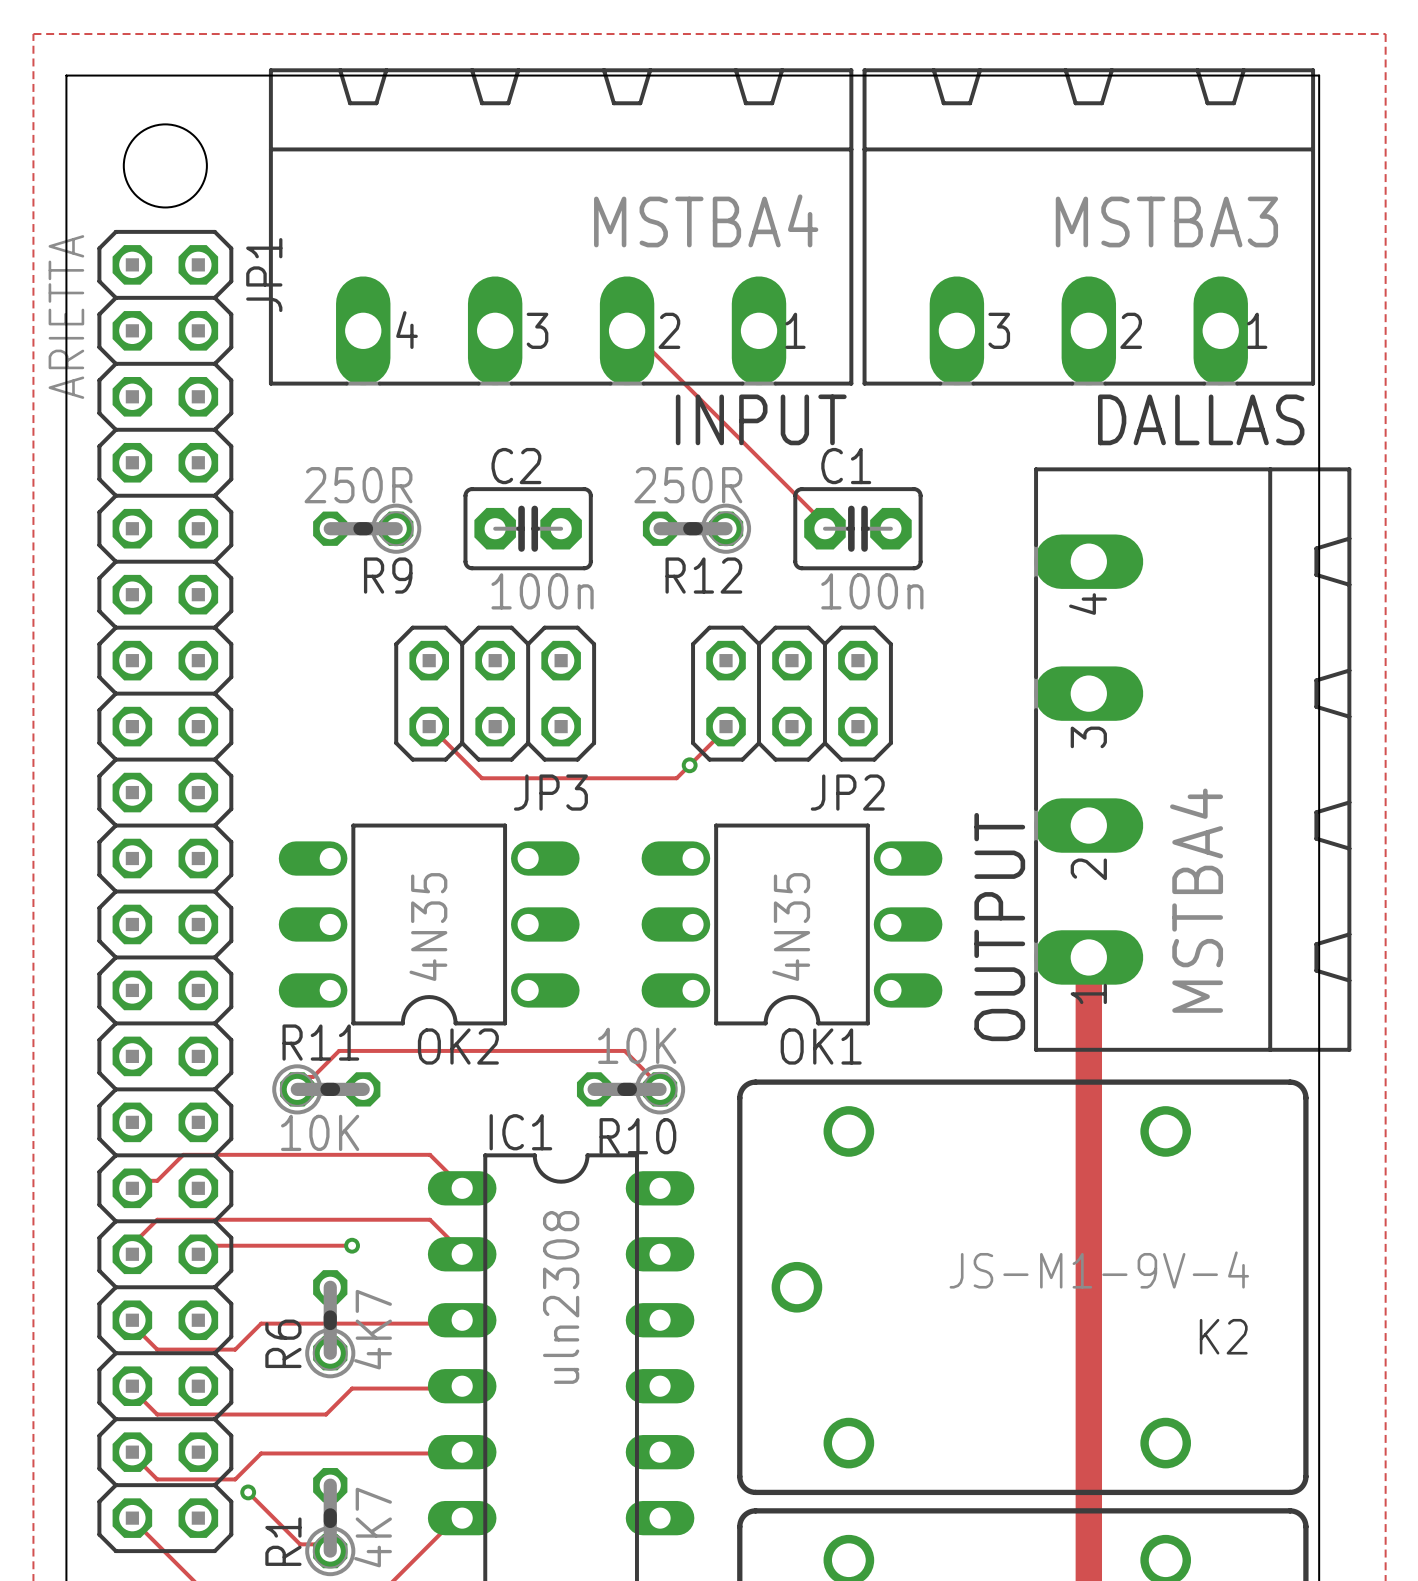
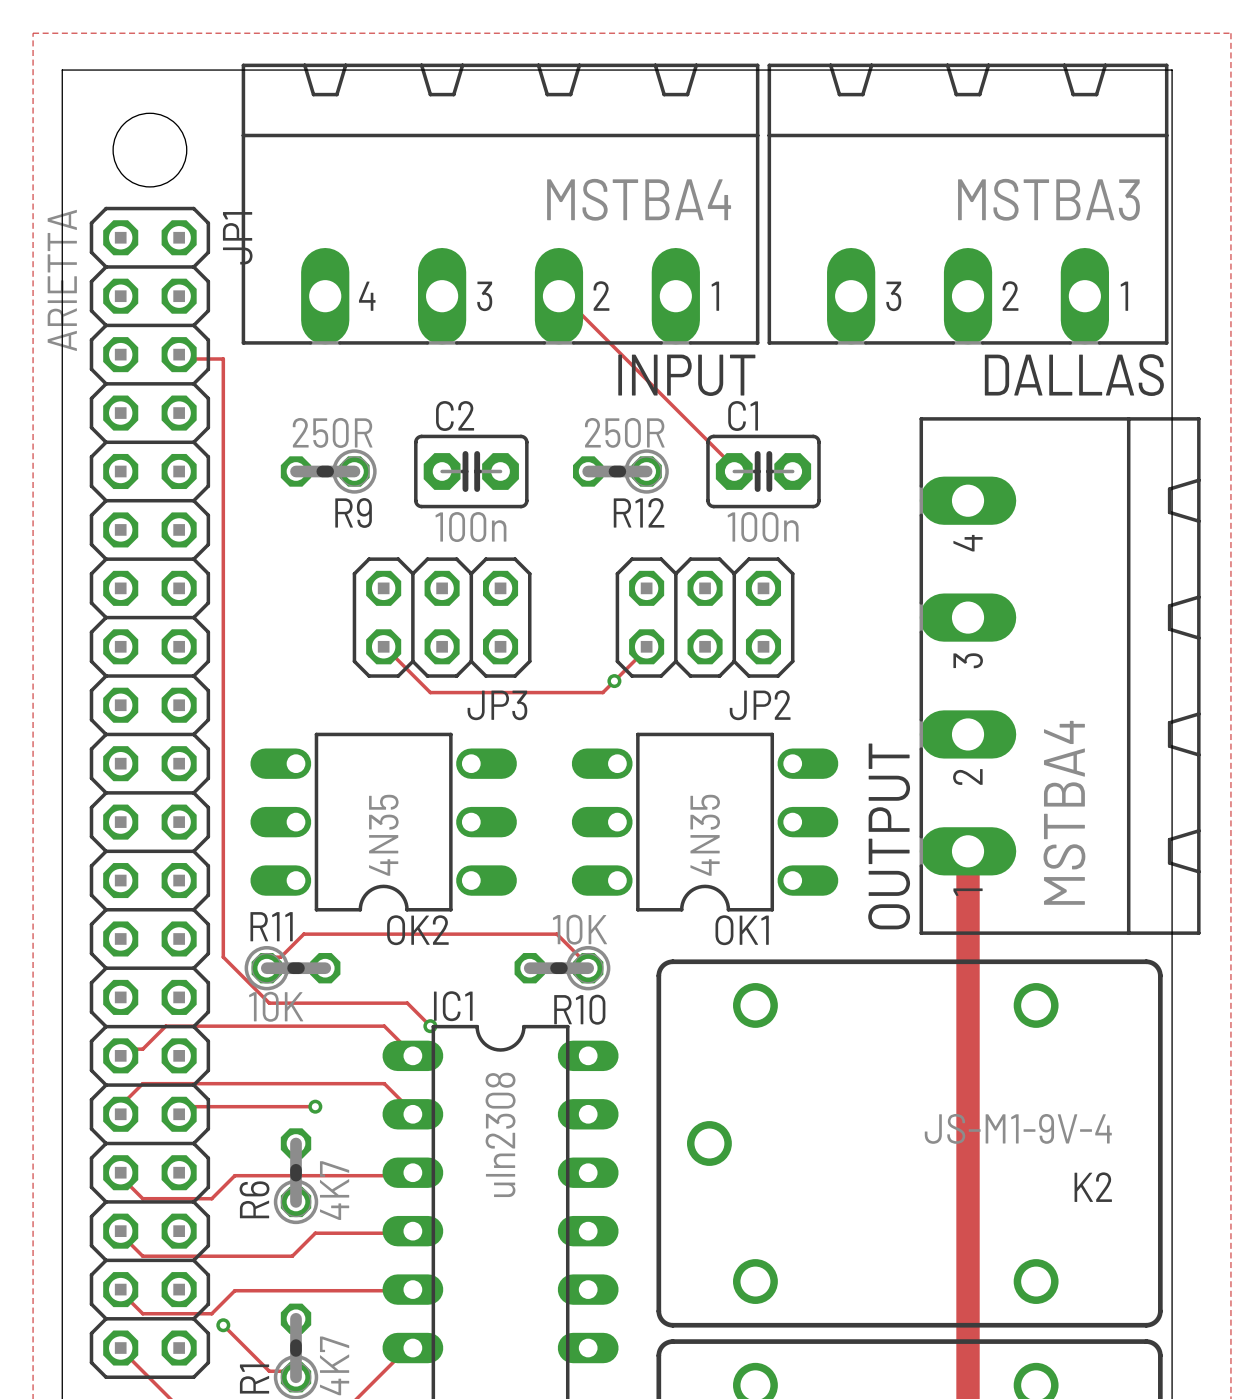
track: none -> (179, 354) (188, 358) (223, 358) (223, 957) (269, 1003) (407, 1003) (430, 1026)
via: none -> (430, 1026)

